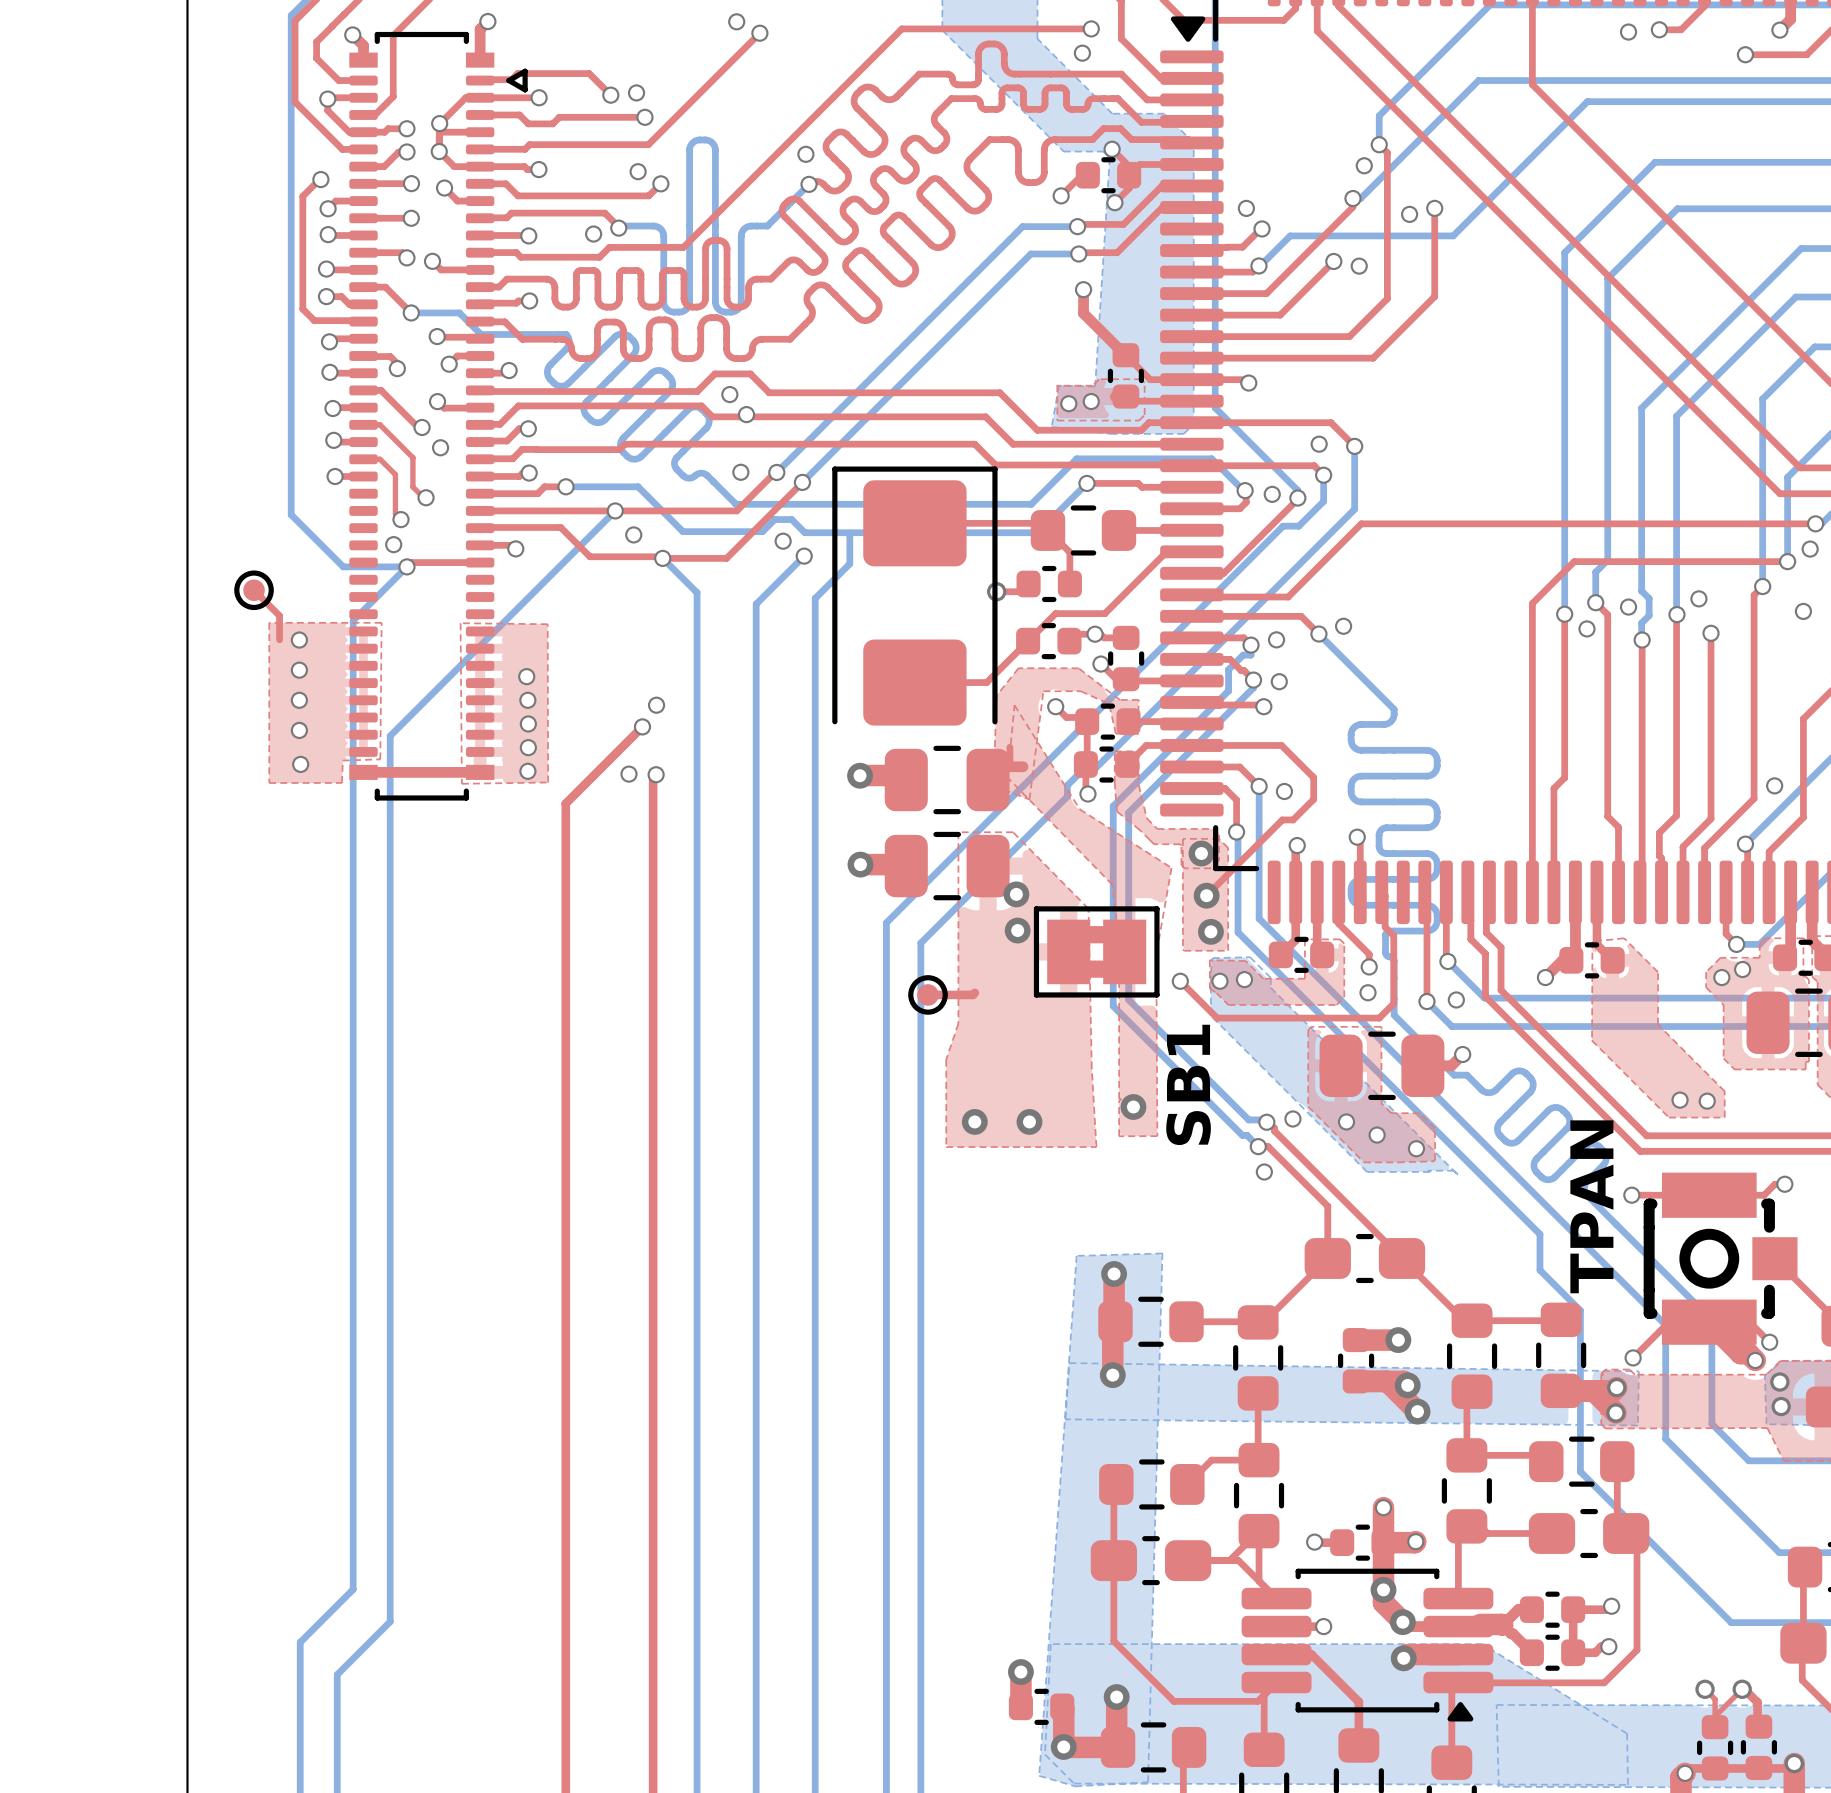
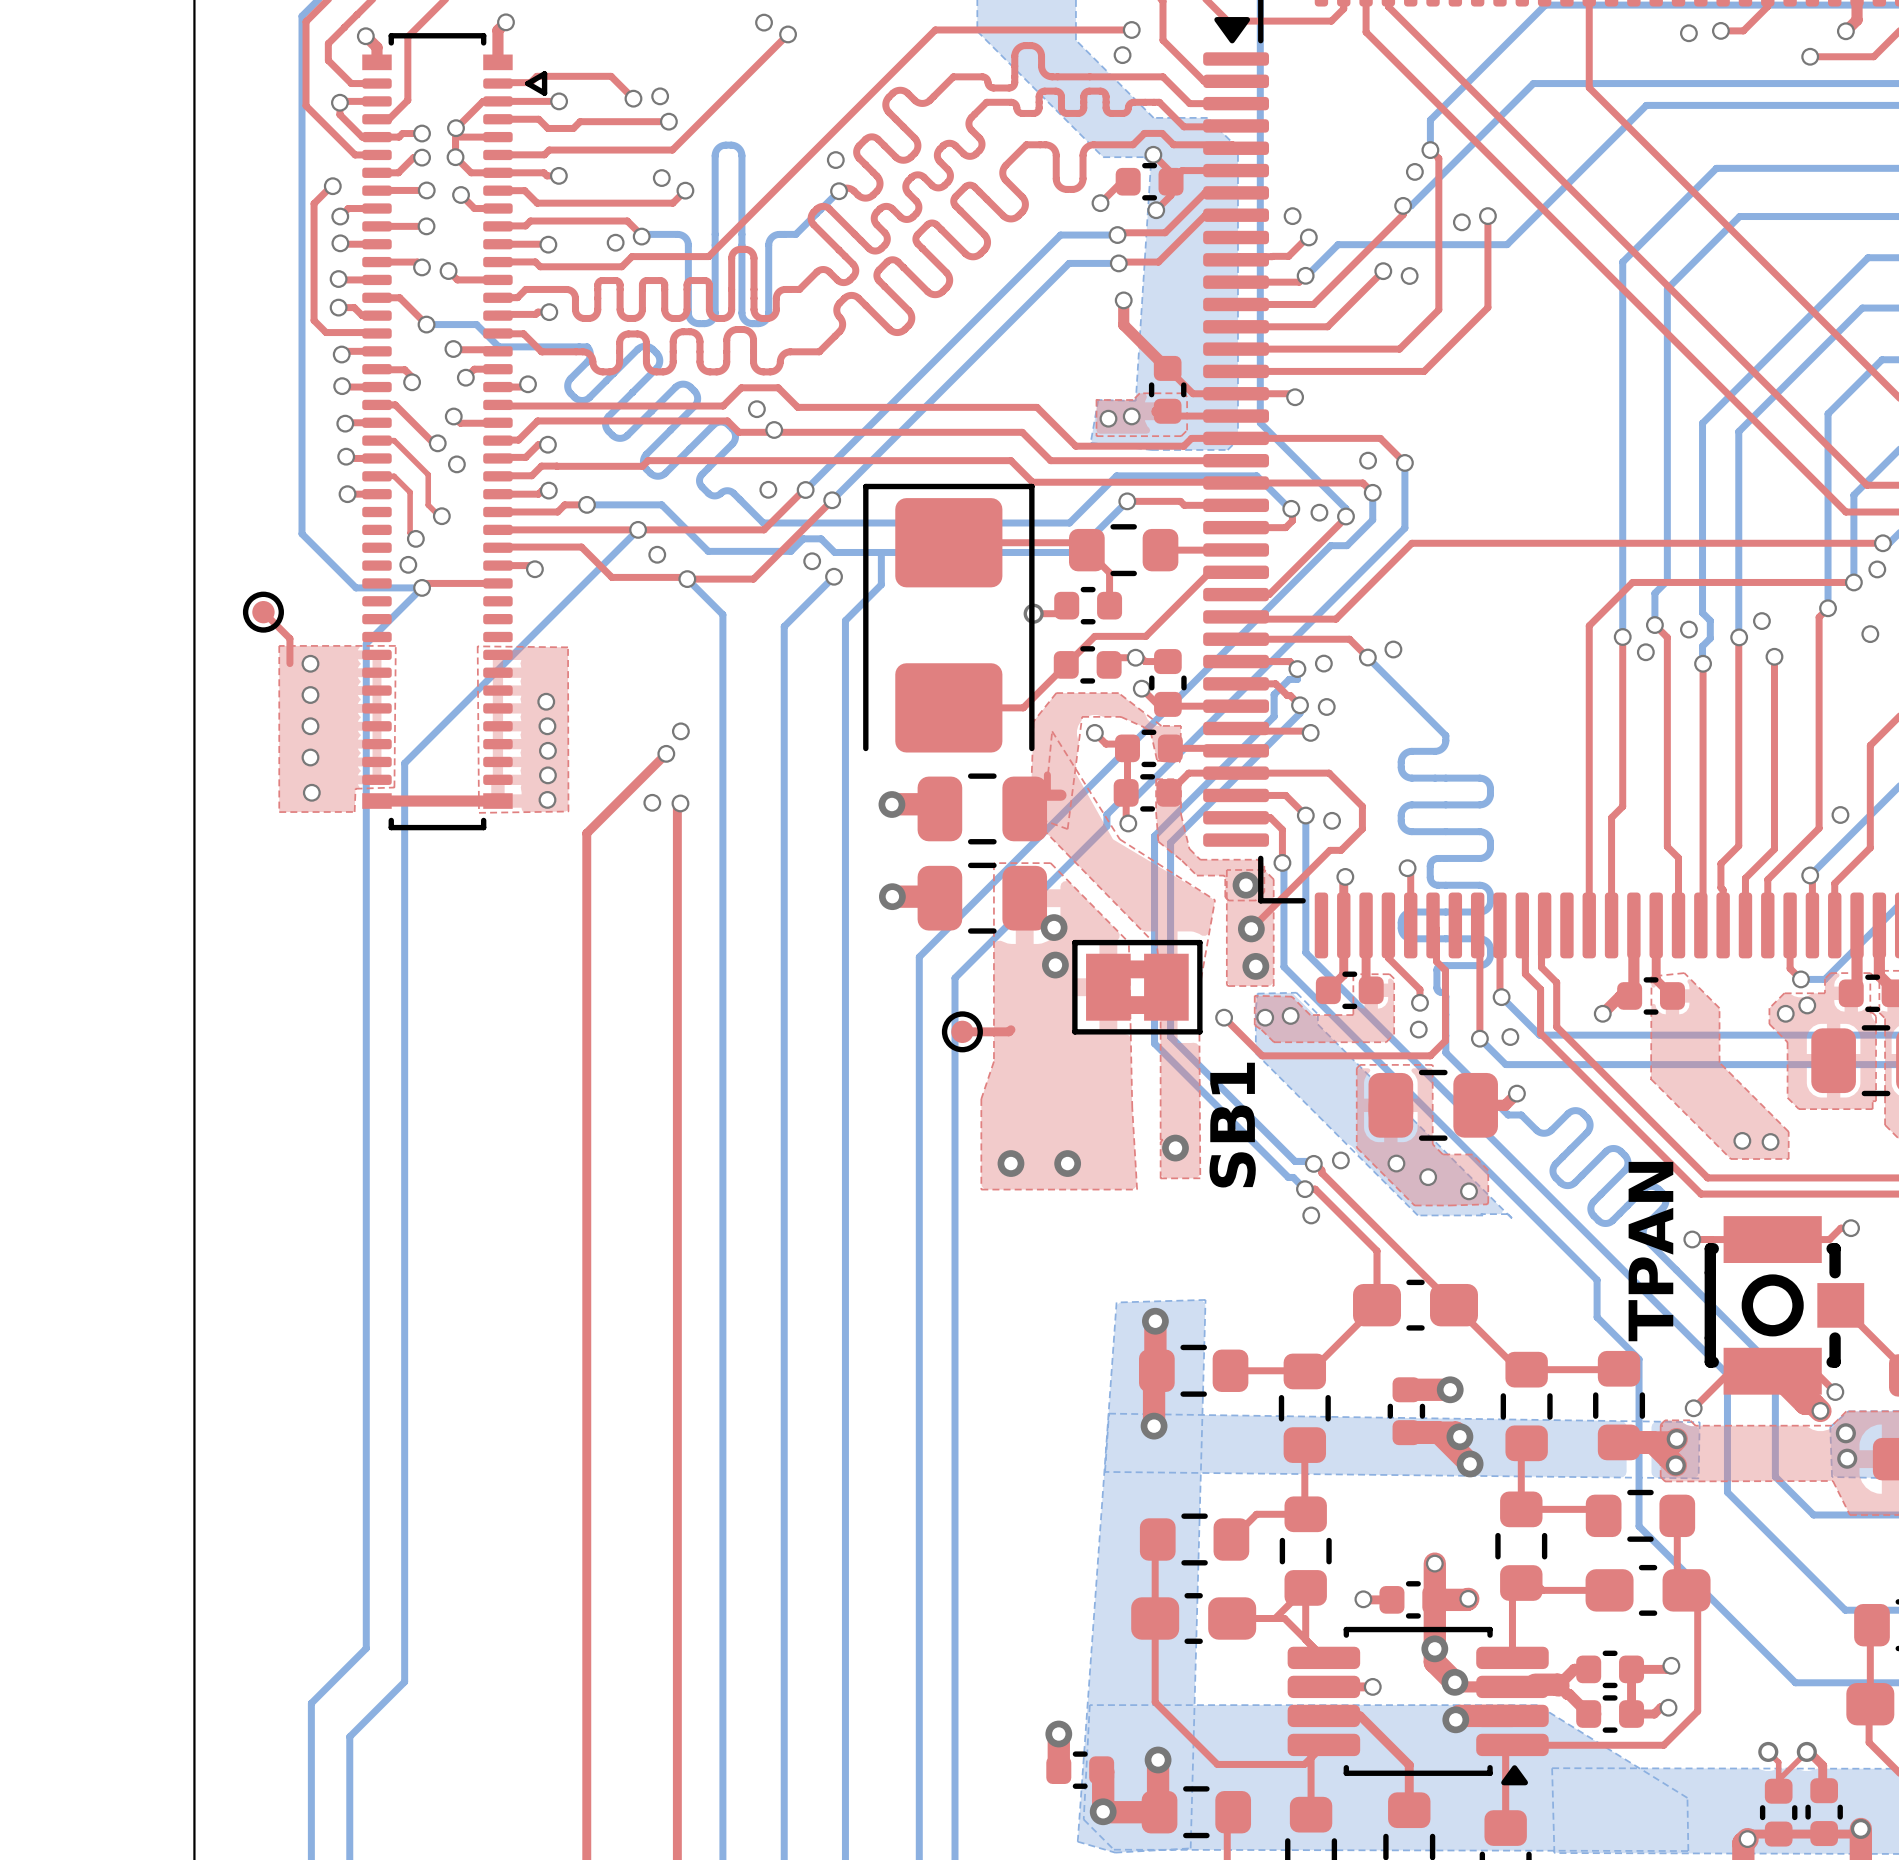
top zone outline: (1007, 777) (1112, 884) (1115, 912) -> (1044, 806) (1042, 829) (1156, 945)

